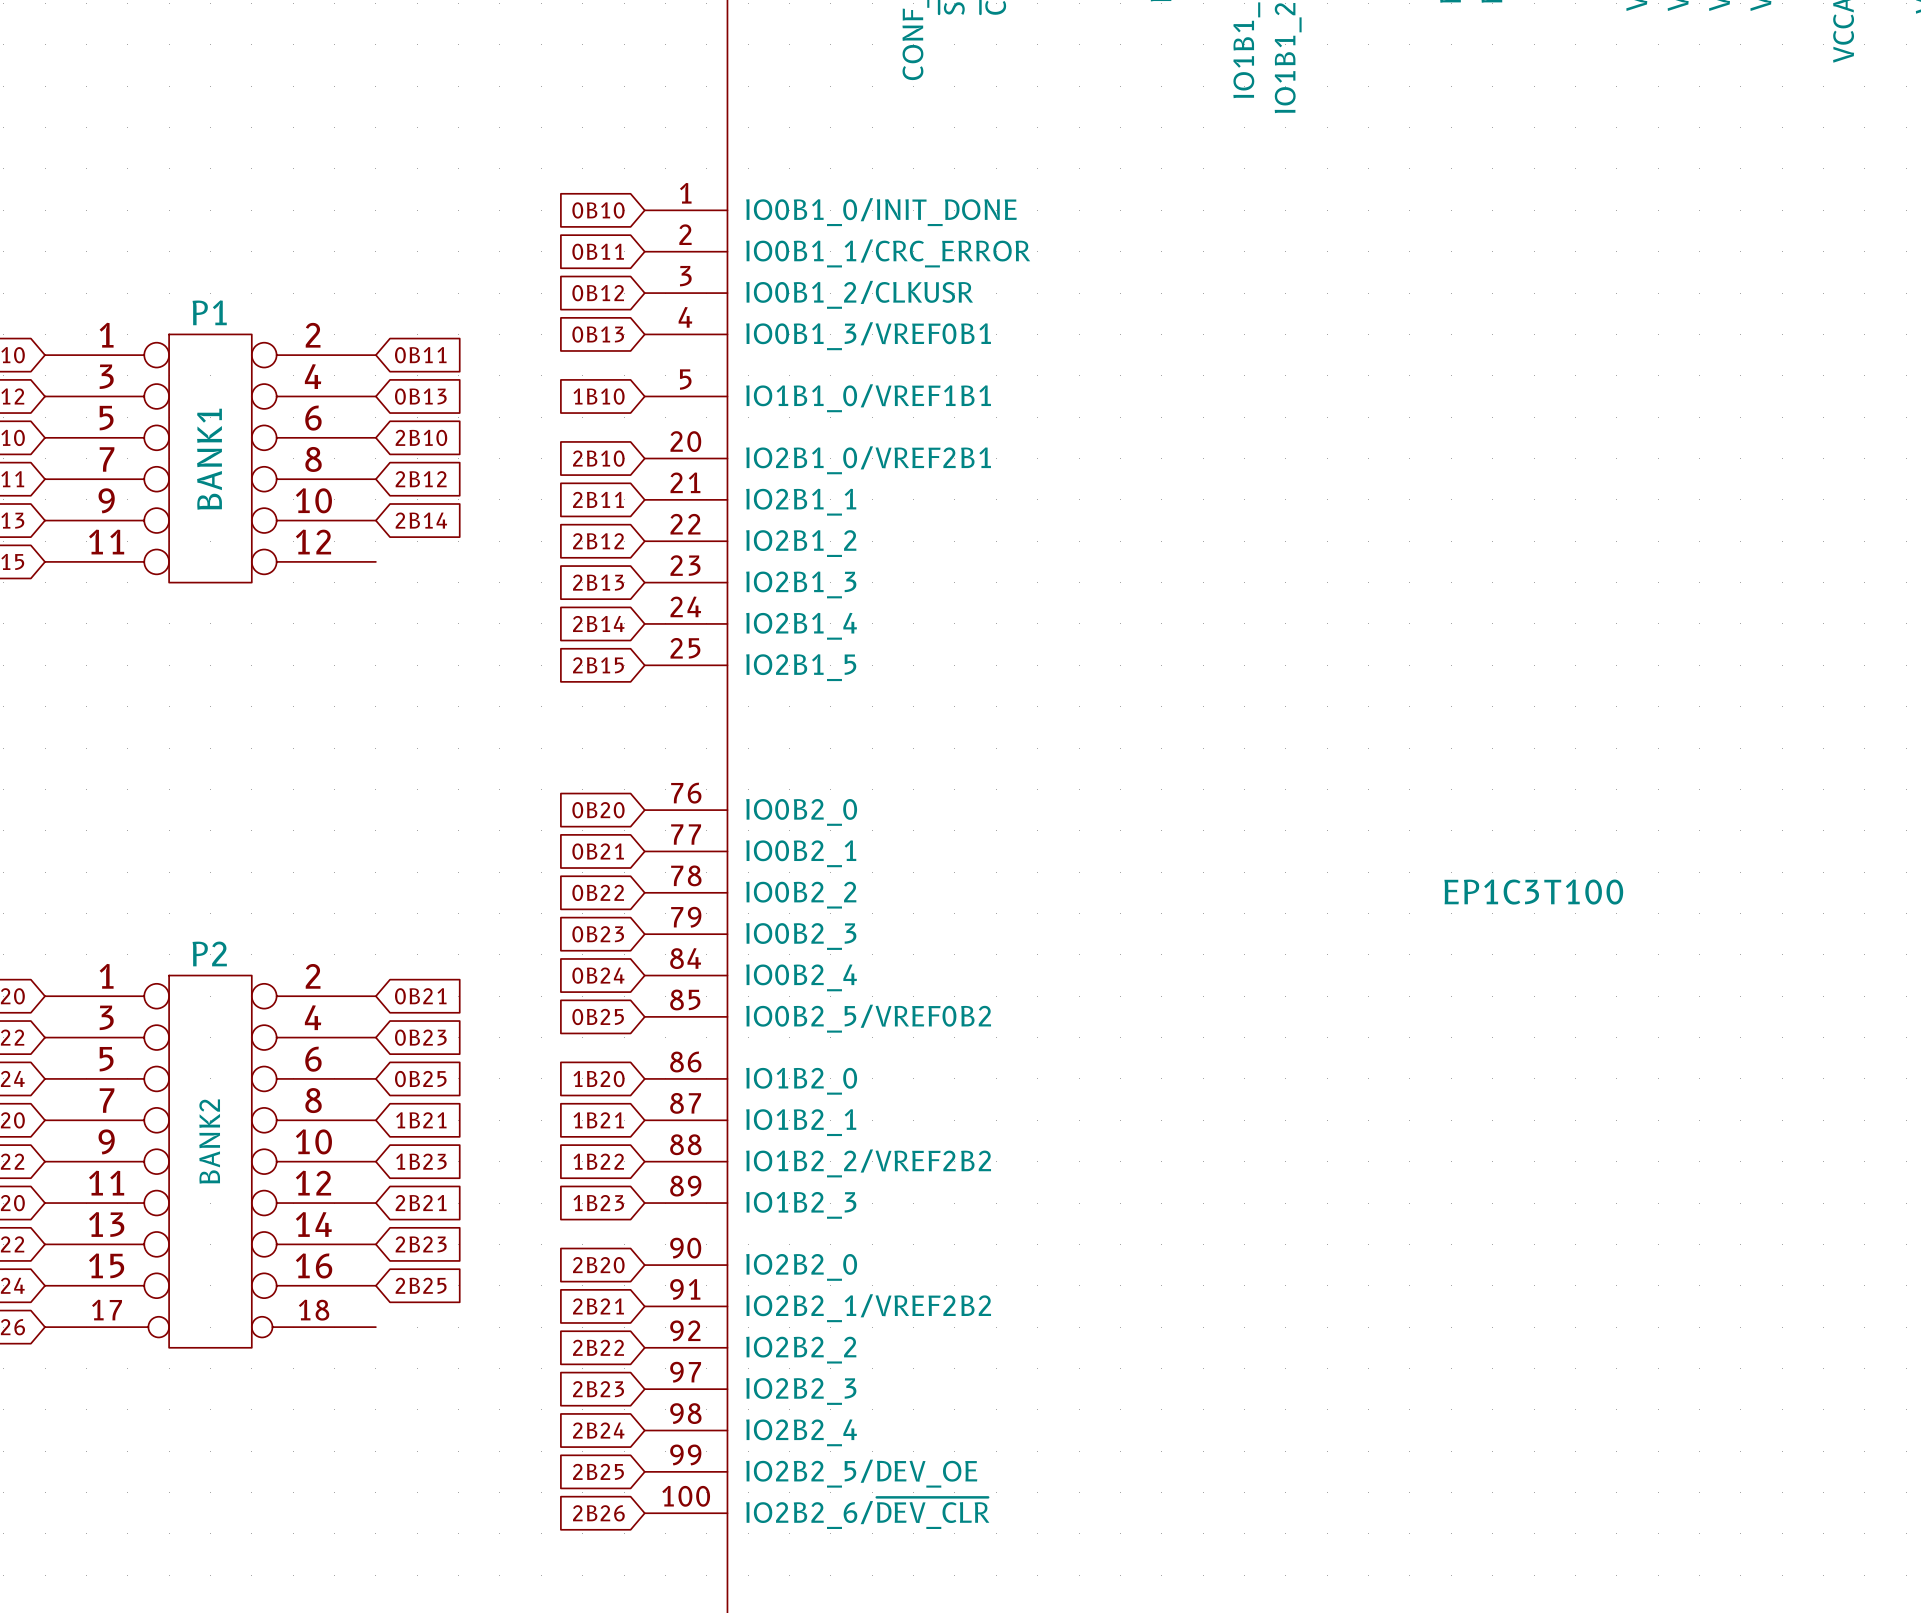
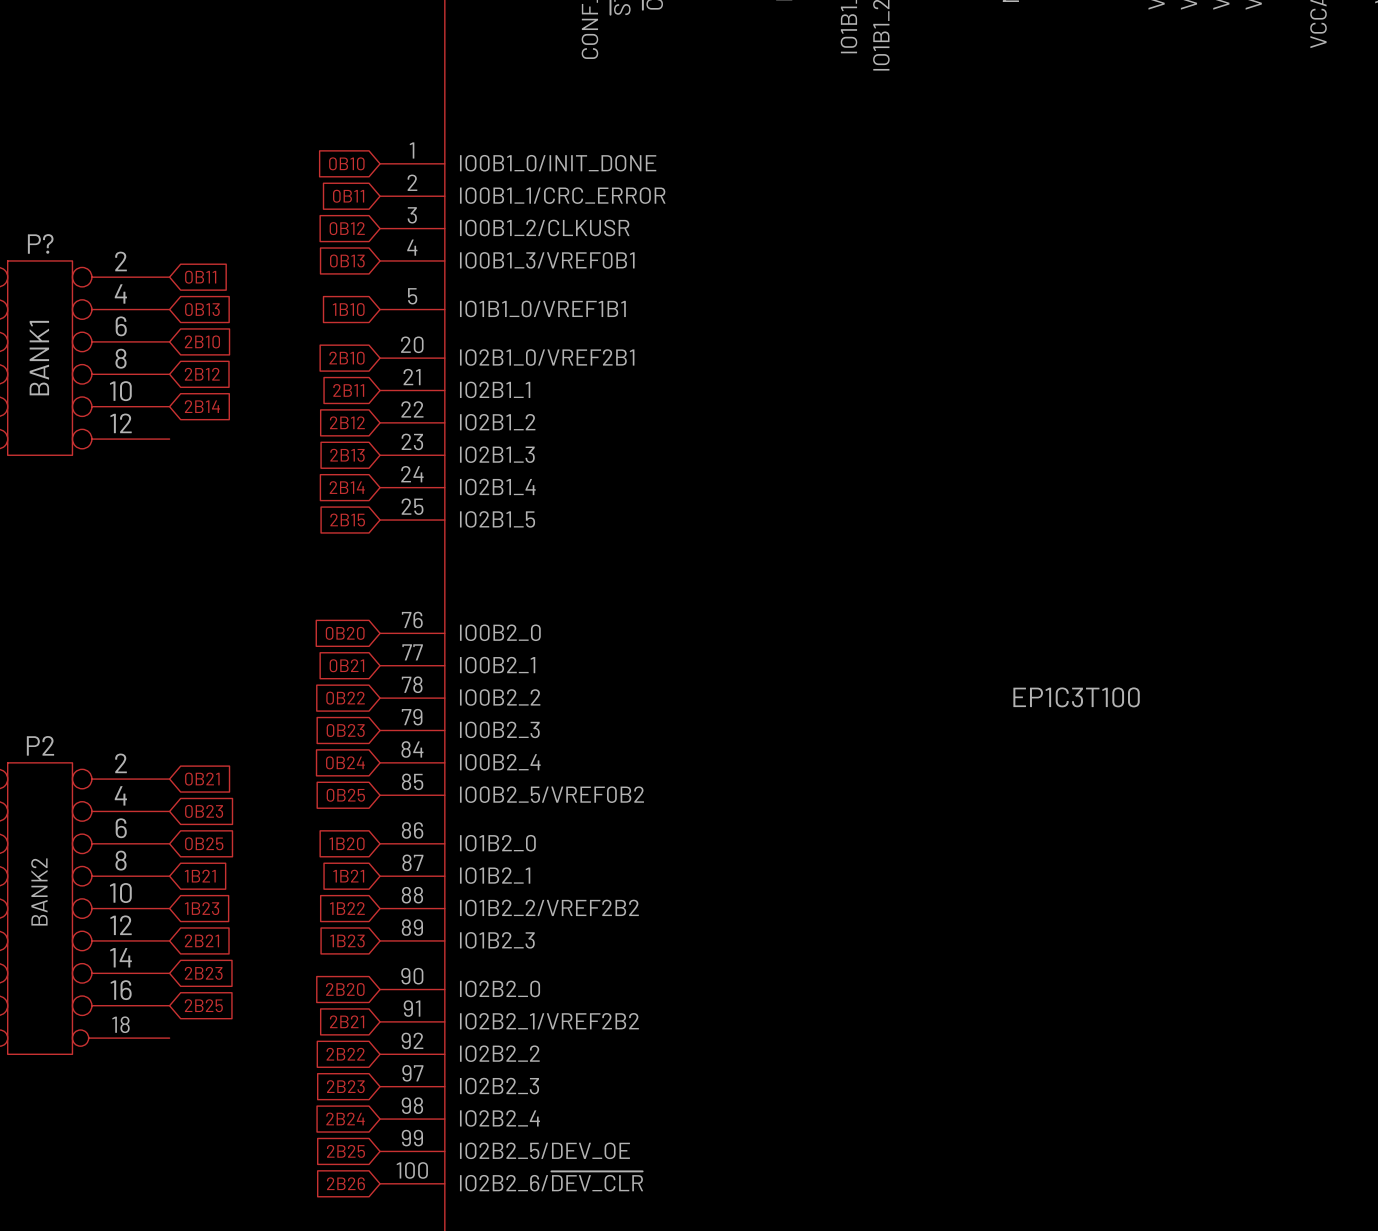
P1 name: P1 (209, 312) -> P? (40, 243)

